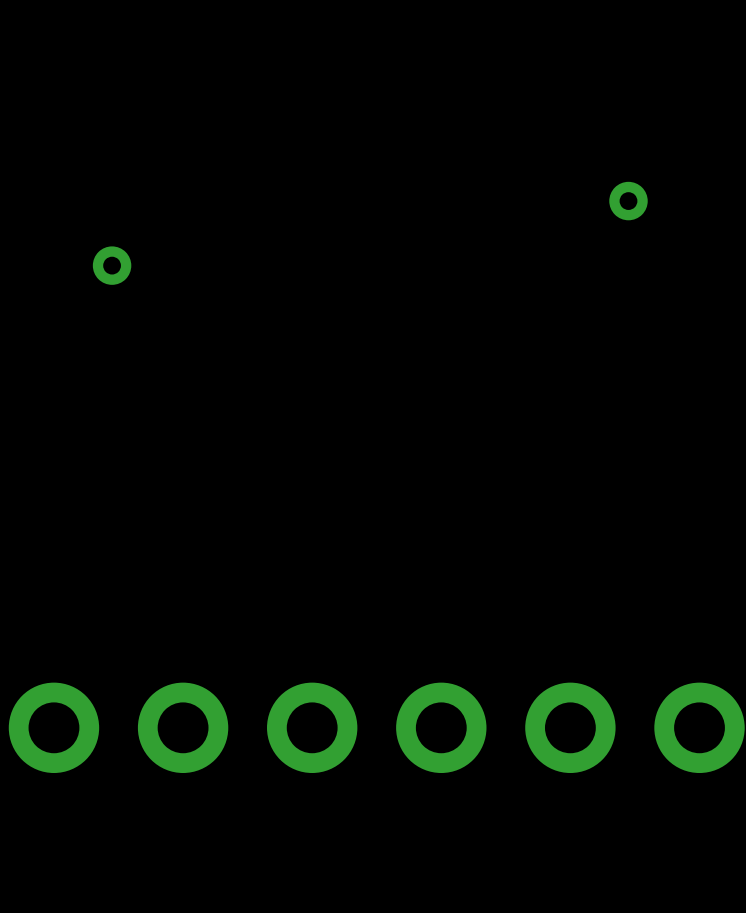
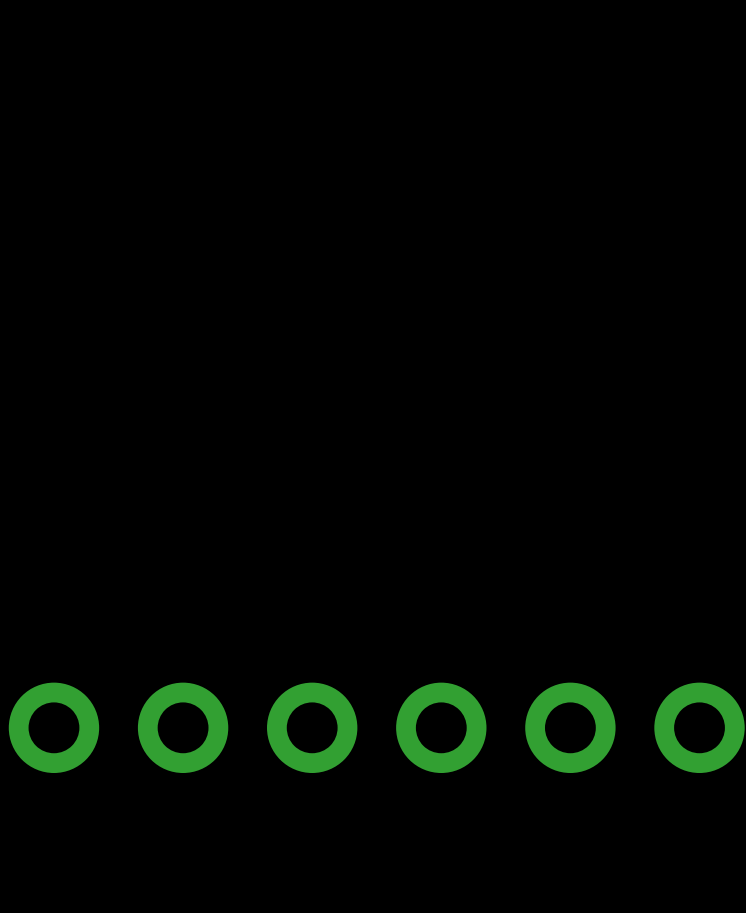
via: (628, 201) -> none
via: (112, 265) -> none

